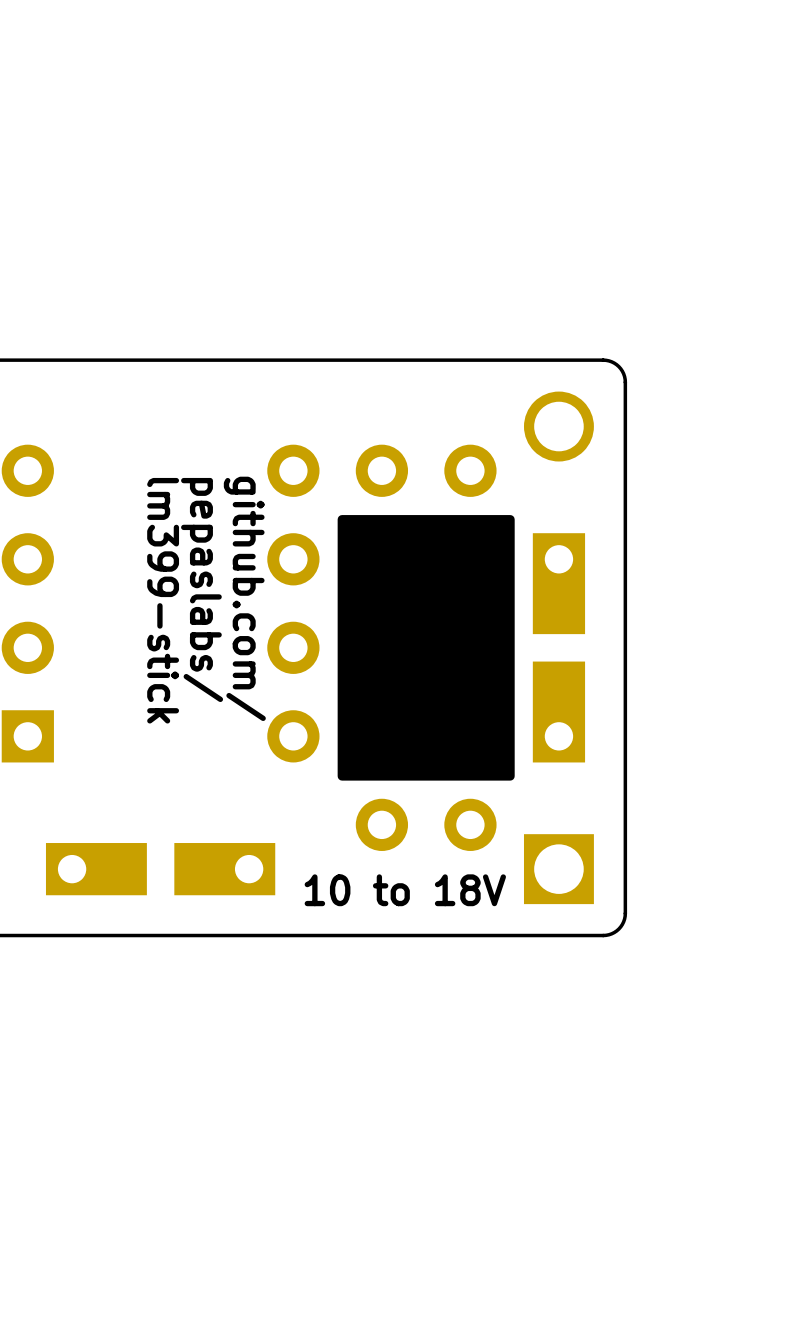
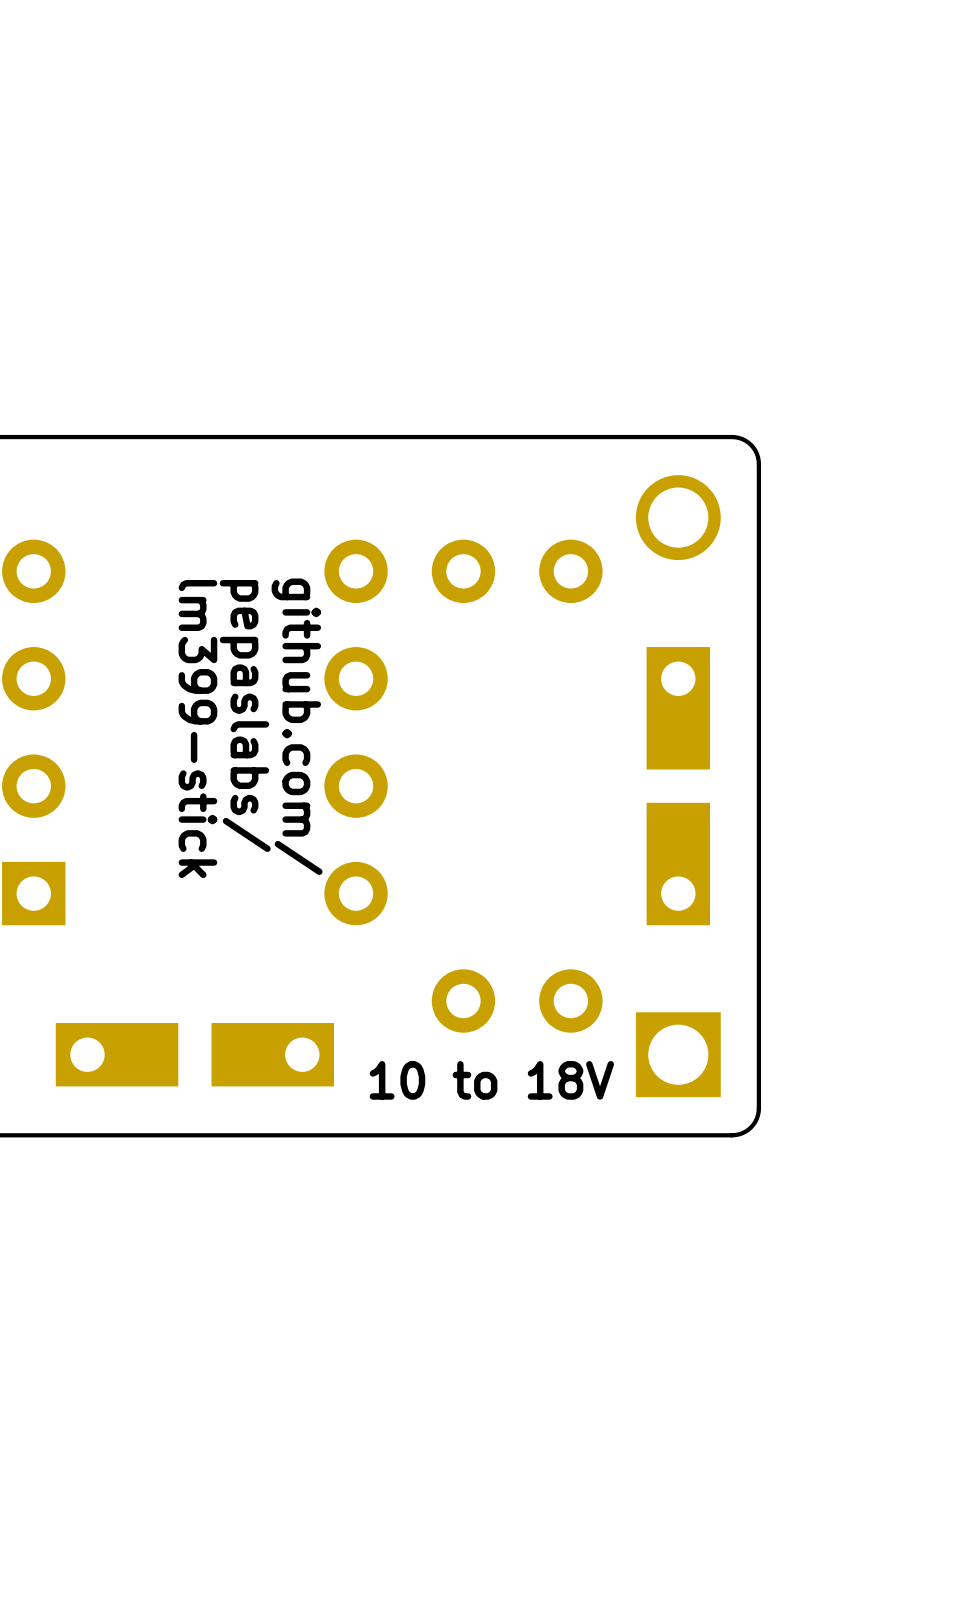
drawing: [337, 515, 515, 781] -> none

